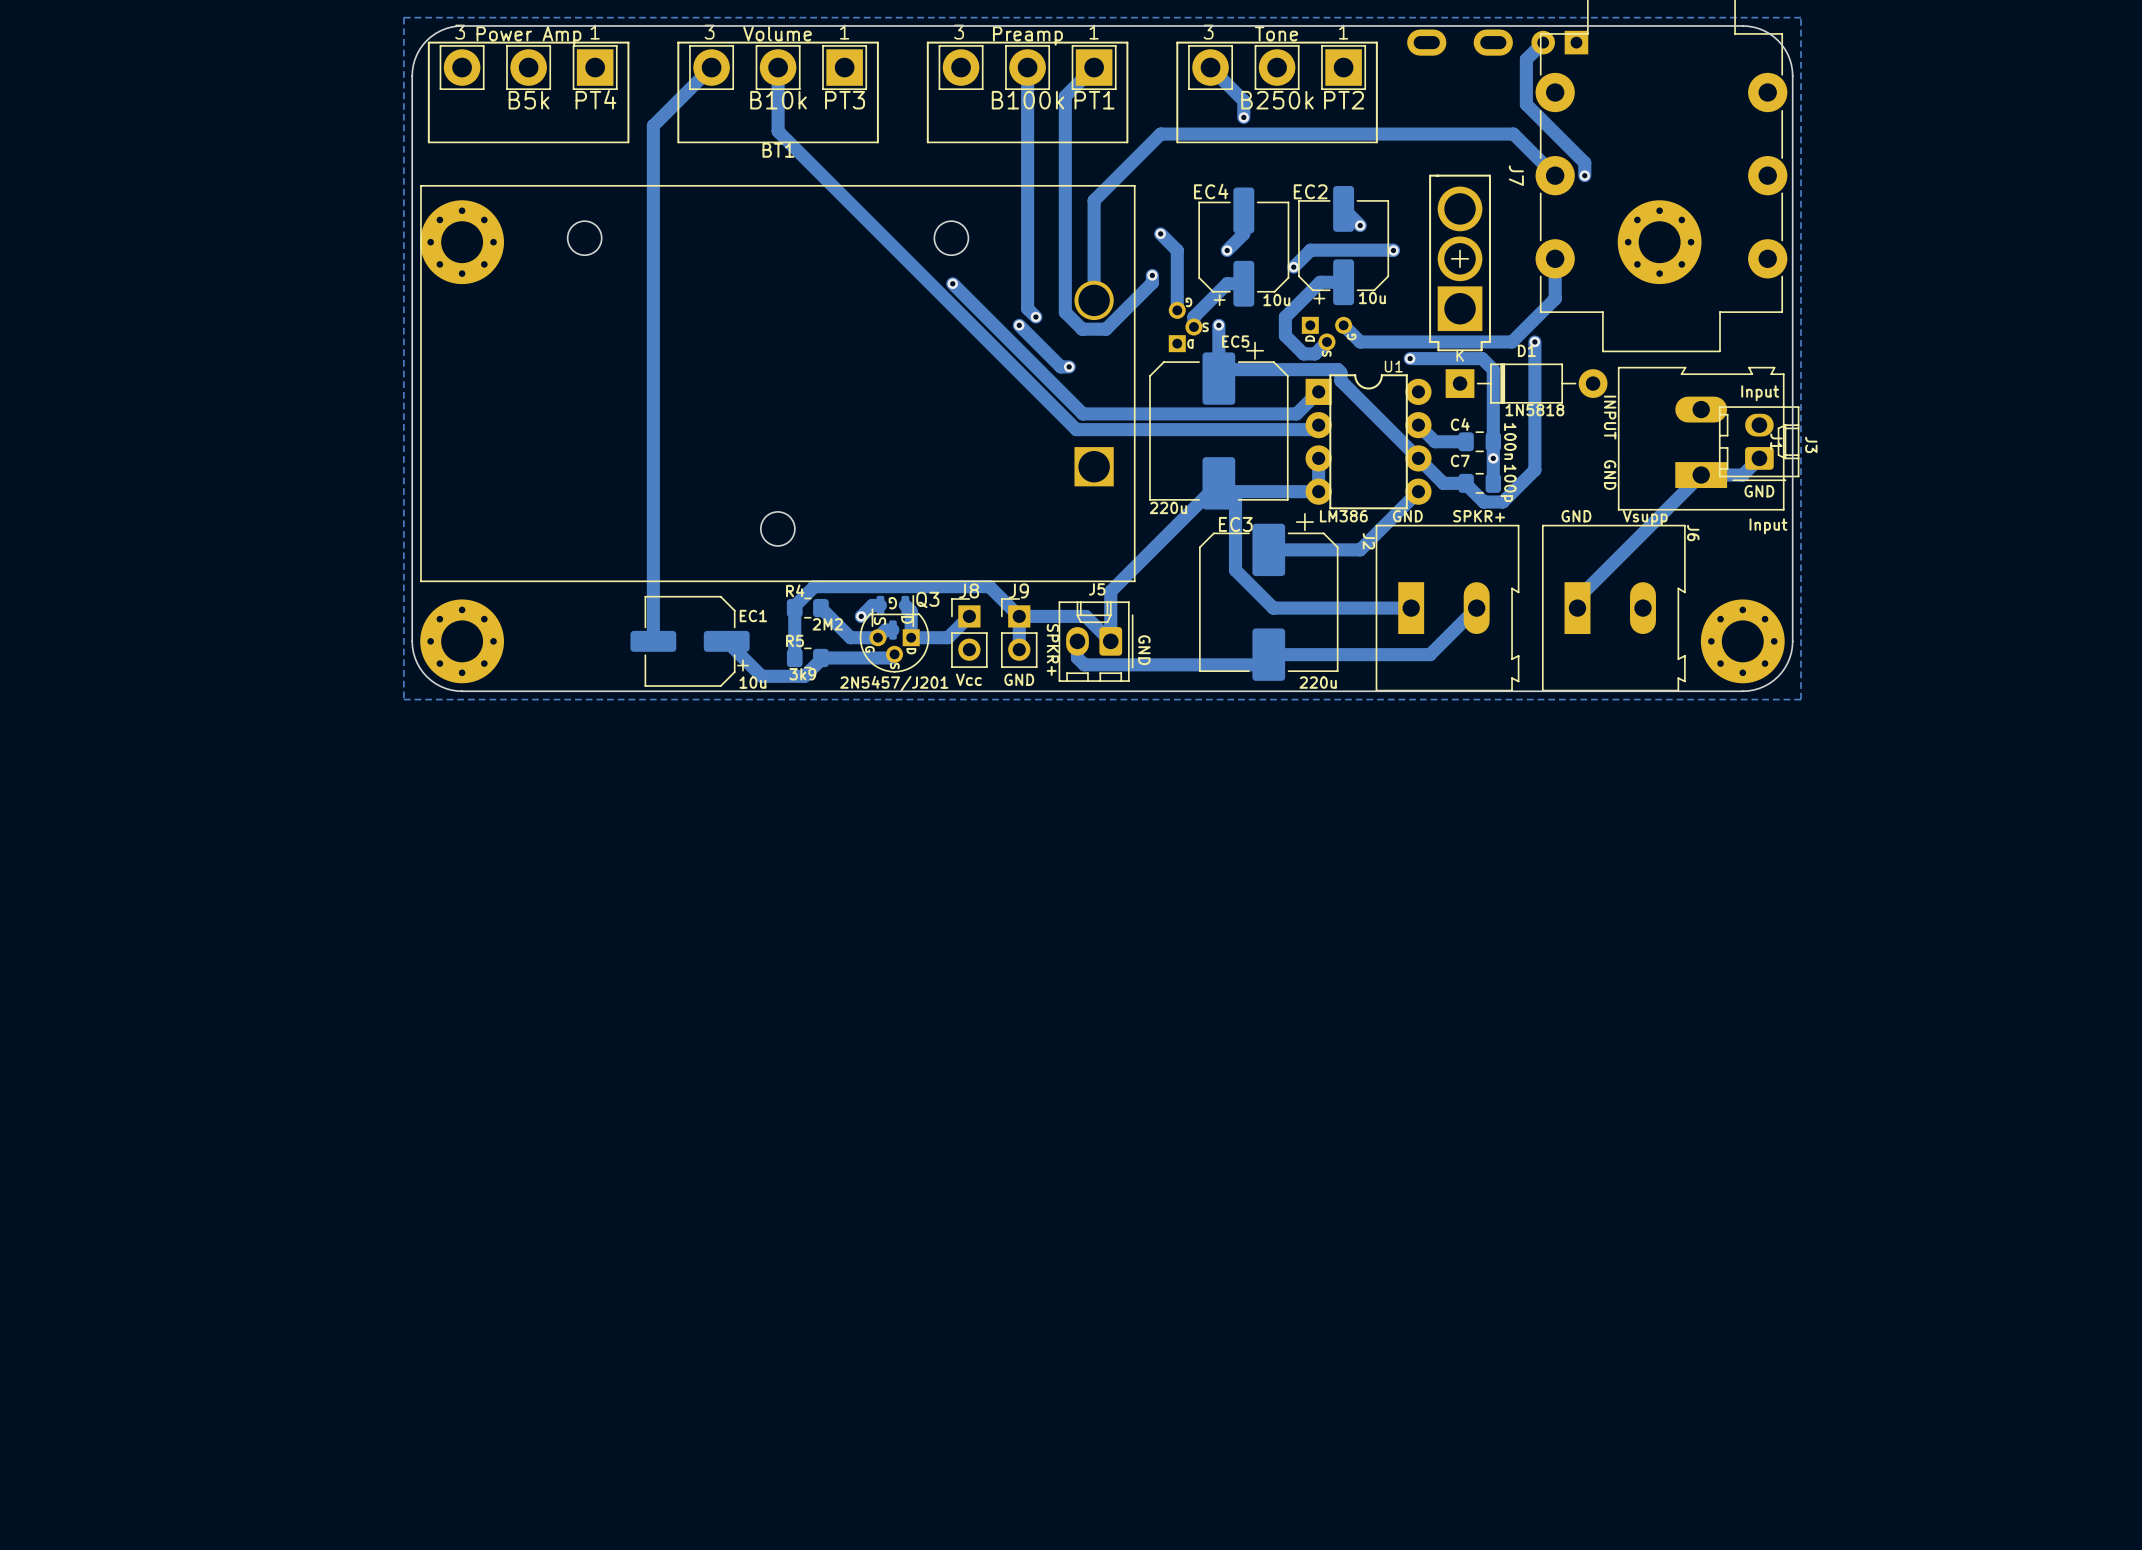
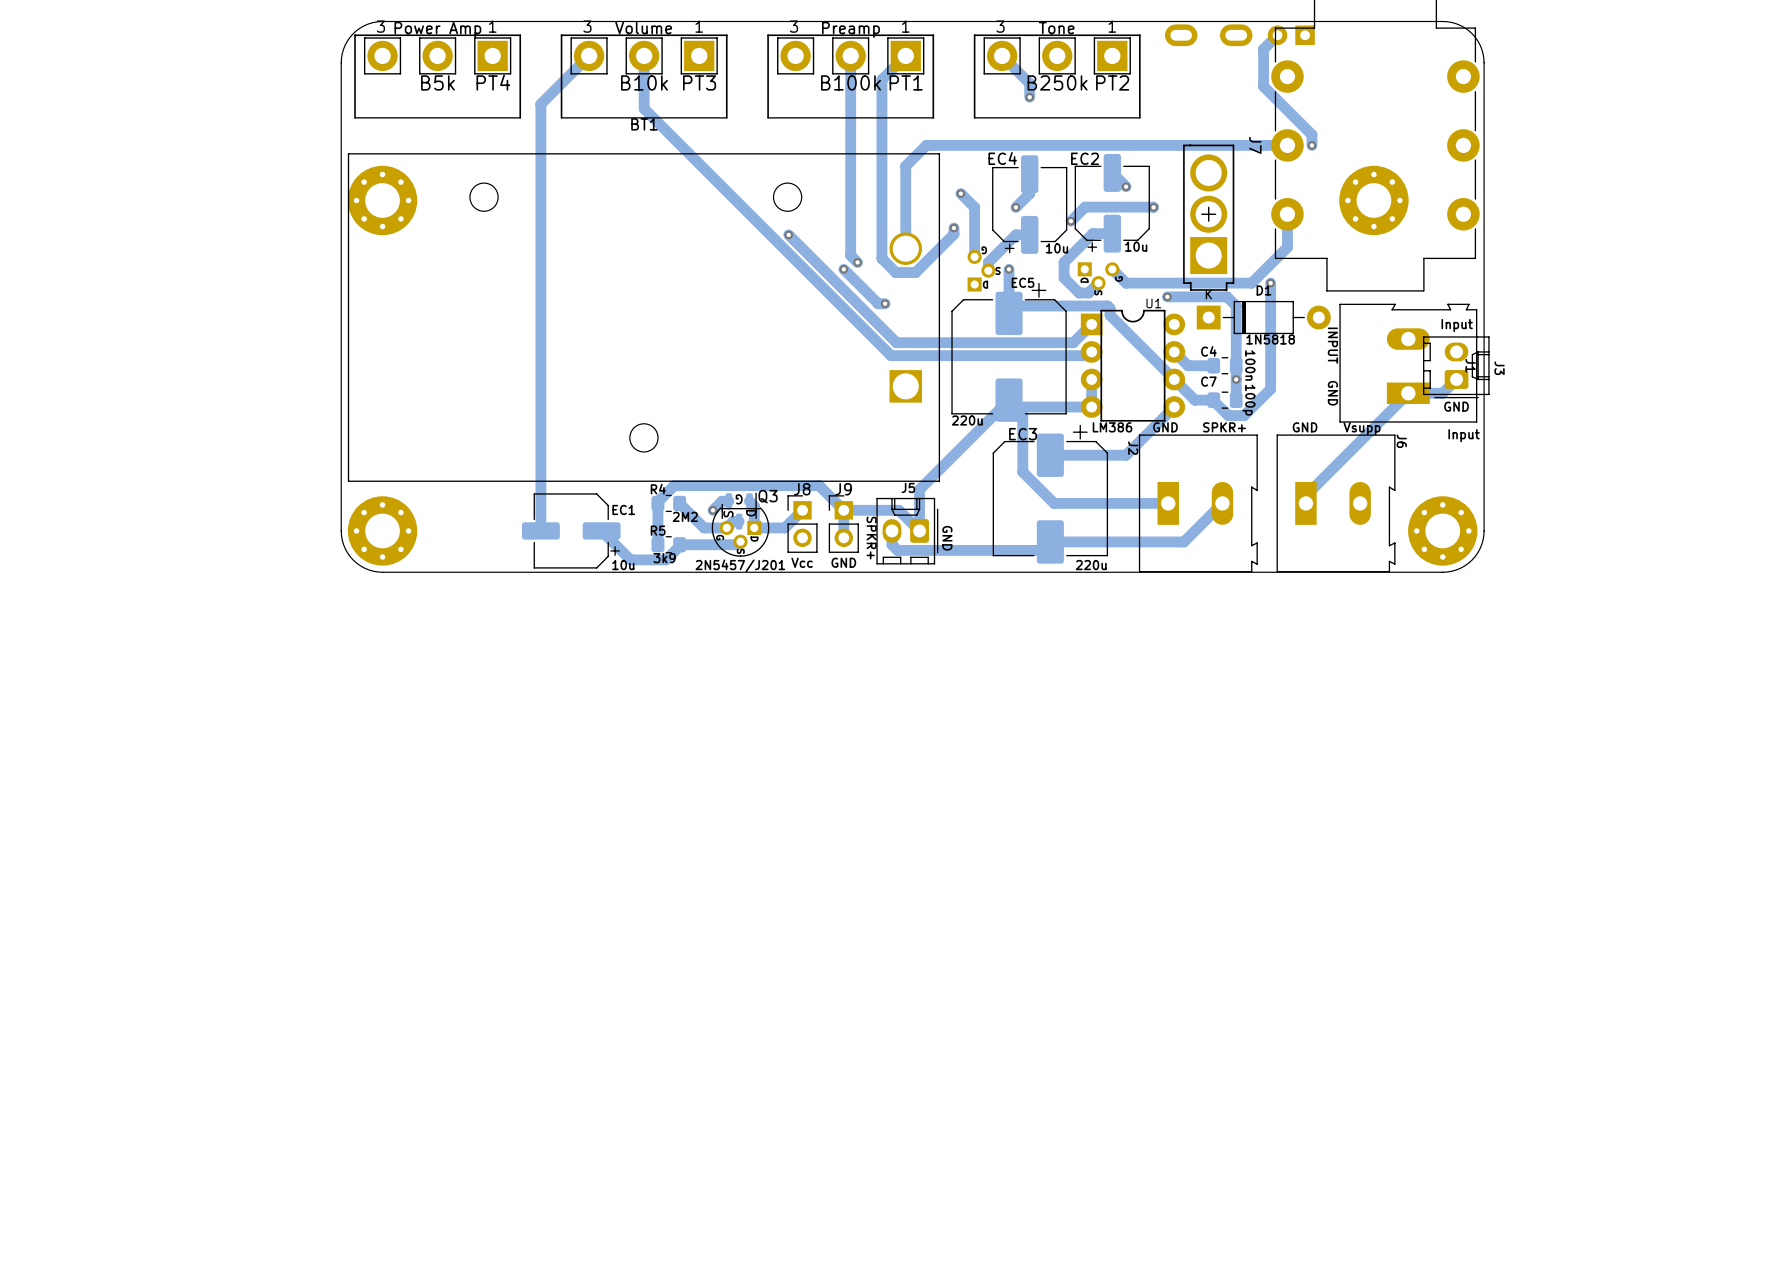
zone outline: (1801, 17) (1801, 699) (403, 699) (403, 17) (1801, 17) -> none
track: (1555, 175) (1513, 134) (1160, 134) (1119, 175) -> (1287, 145) (926, 145)

